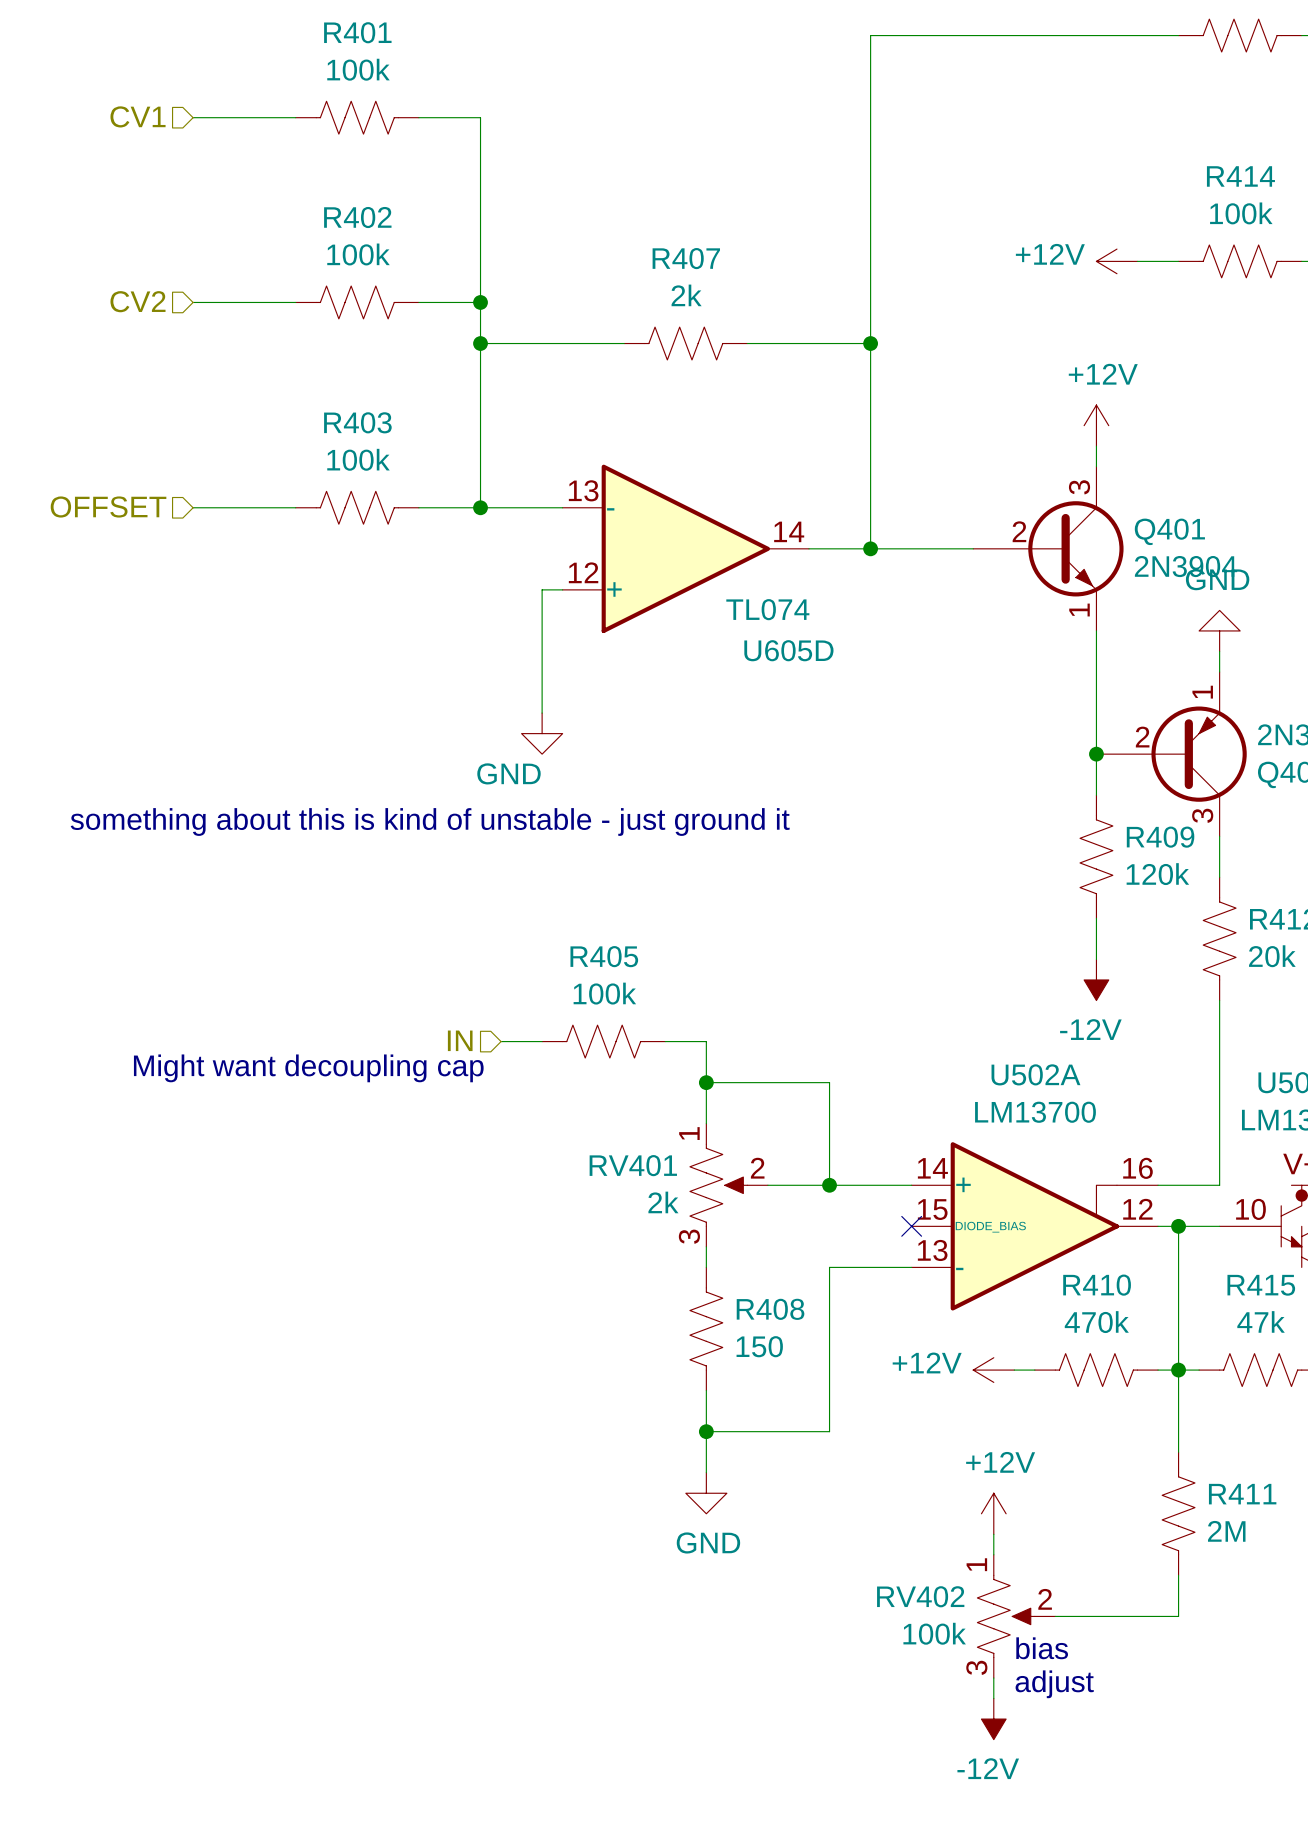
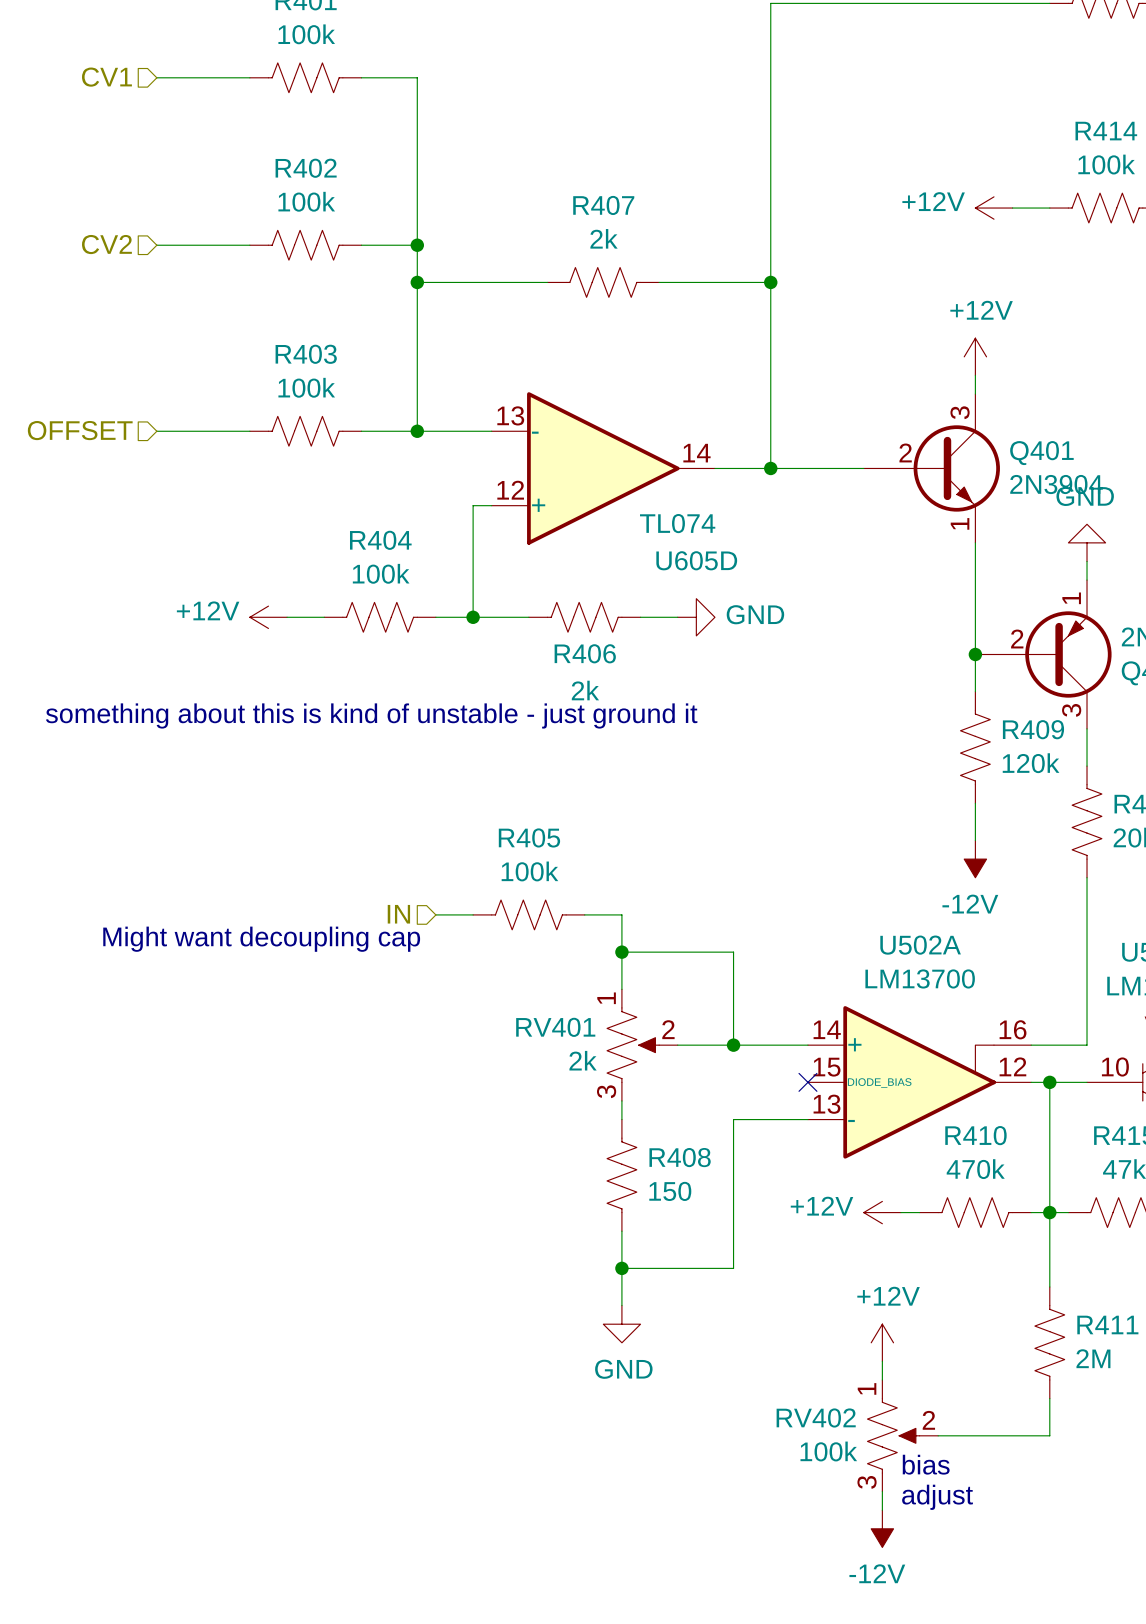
power symbol: none -> +12V (268, 617)
wire: none -> (287, 617) (324, 617)
R404: none -> 100k (380, 617)
wire: none -> (435, 617) (528, 617)
junction: none -> (473, 617)
R406: none -> 2k (584, 617)
wire: none -> (640, 617) (677, 617)
power symbol rotation: 0° (542, 733) -> 90° counterclockwise (696, 617)
power symbol position: GND (542, 733) -> GND (696, 617)
power symbol text position: GND (508, 773) -> GND (755, 614)

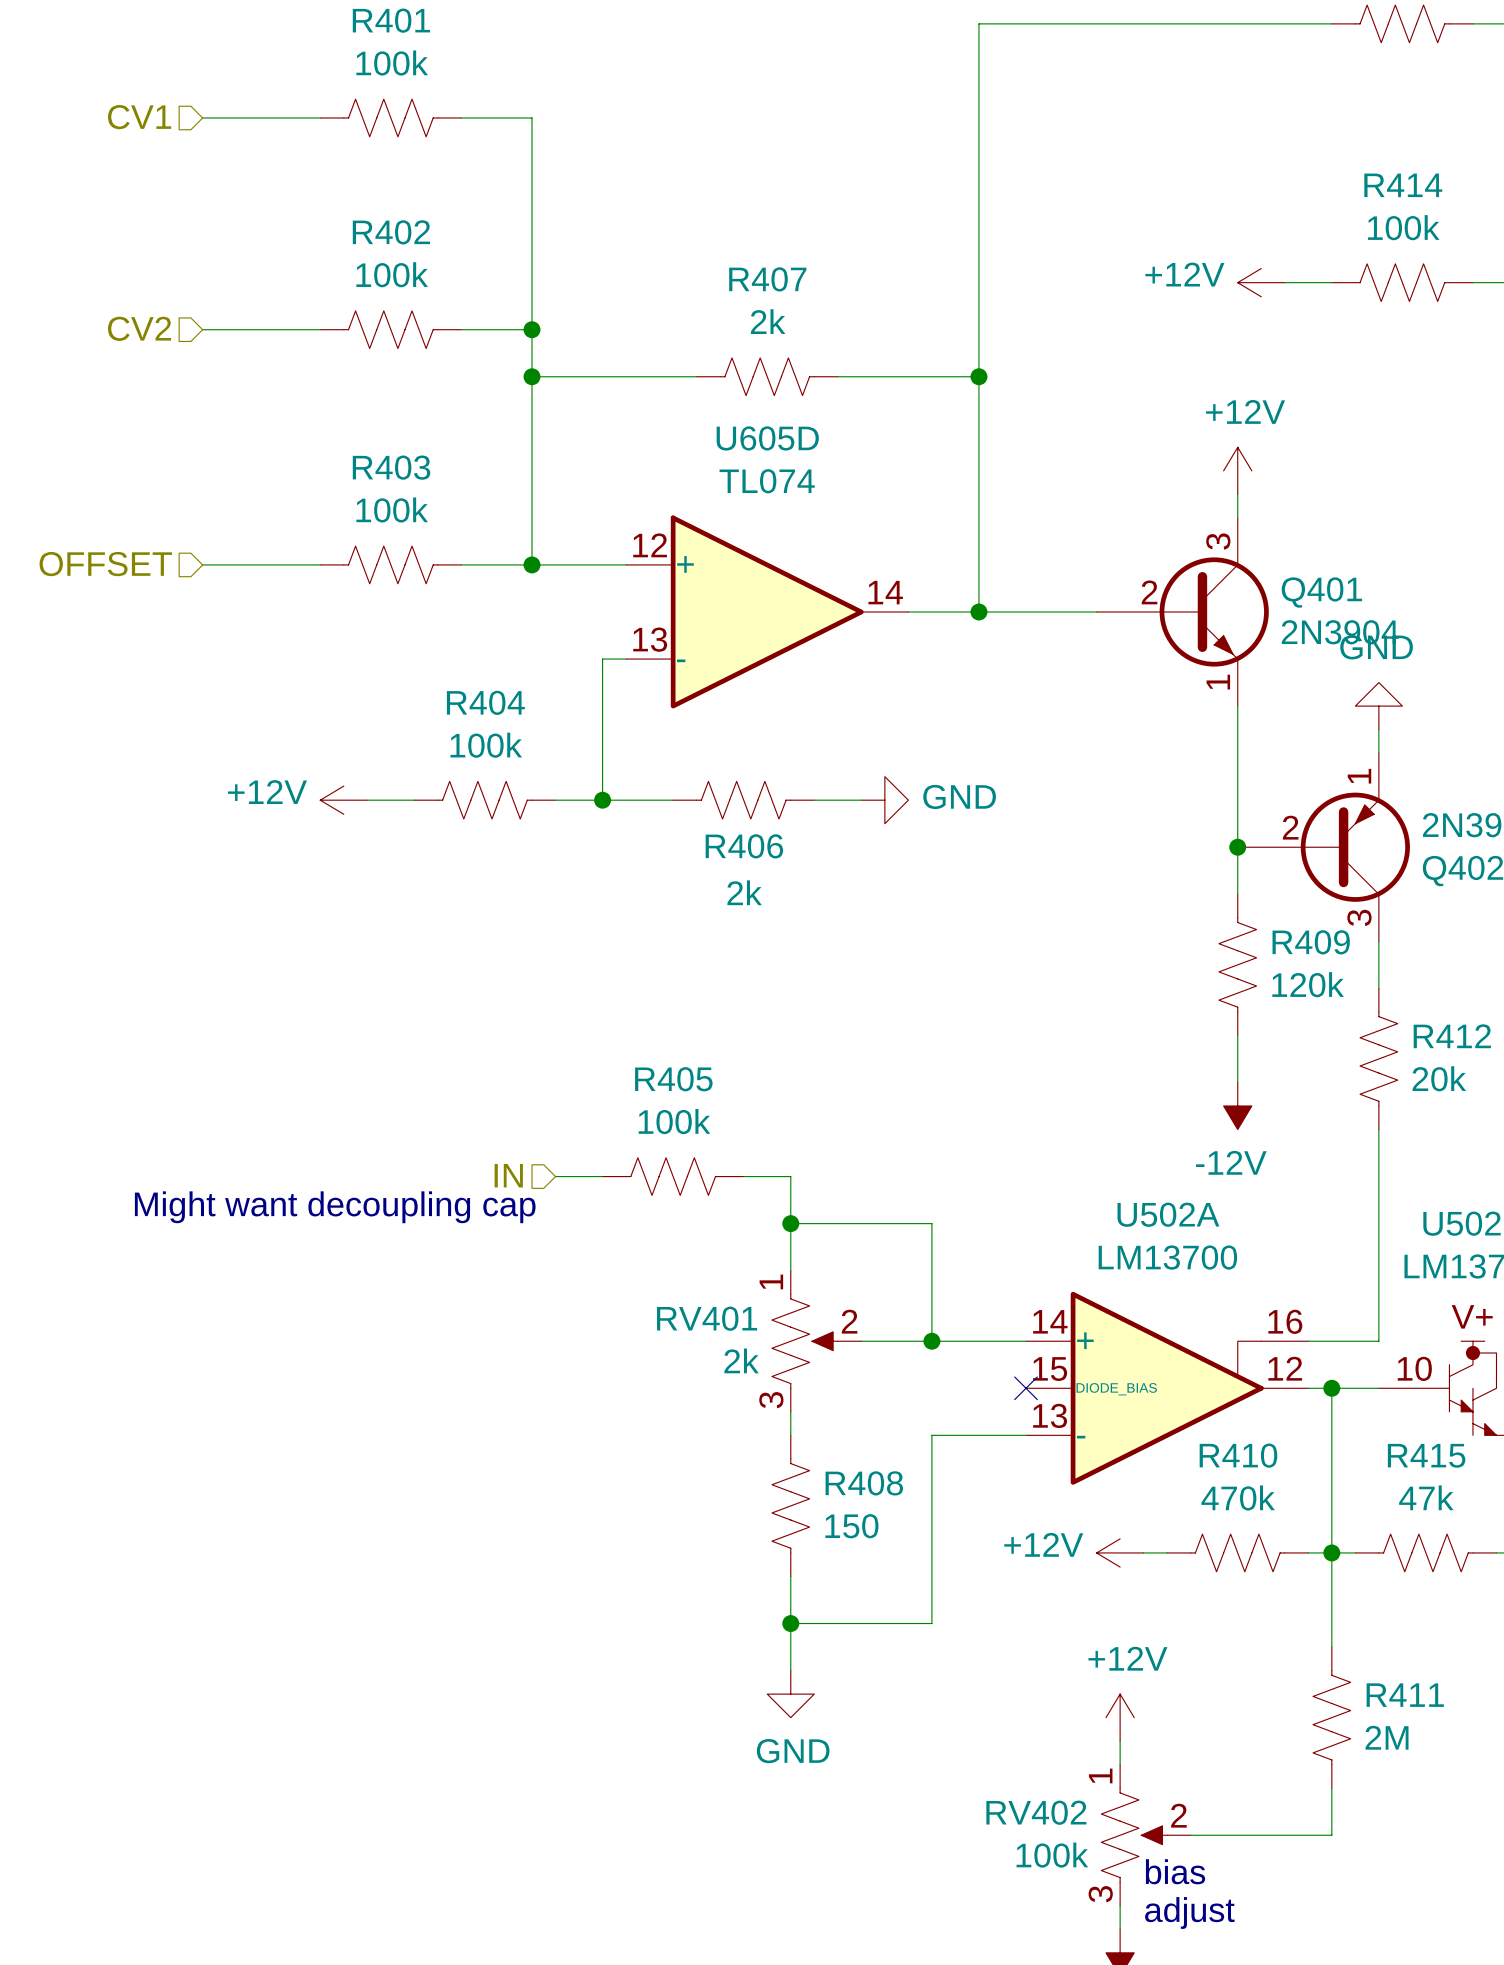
U605D flip: as is (603, 468) -> up-down (767, 611)
U605D value position: TL074 (677, 523) -> TL074 (767, 481)
U605D name position: U605D (696, 560) -> U605D (767, 438)
text: something about this is kind of unstable - just ground it (371, 715) -> none

